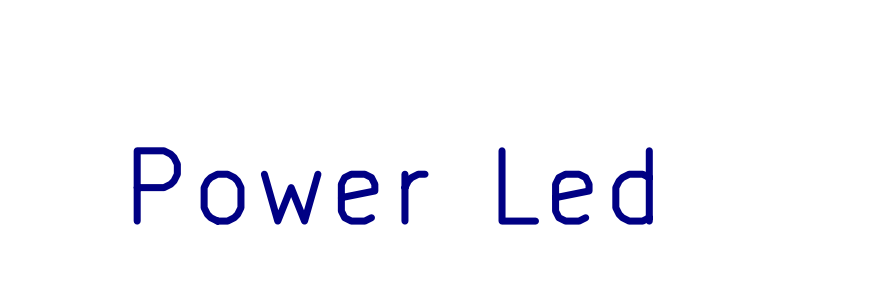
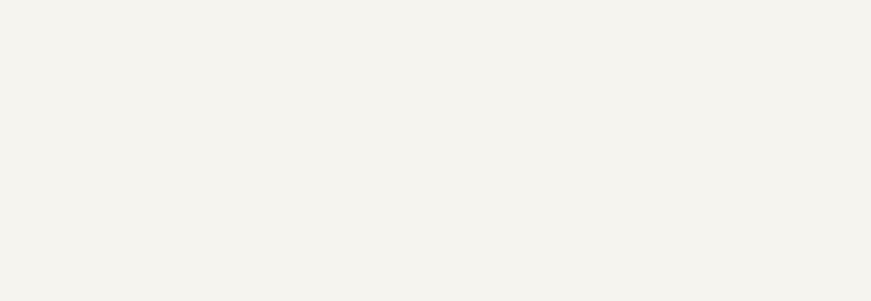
text: Power Led (393, 185) -> none

